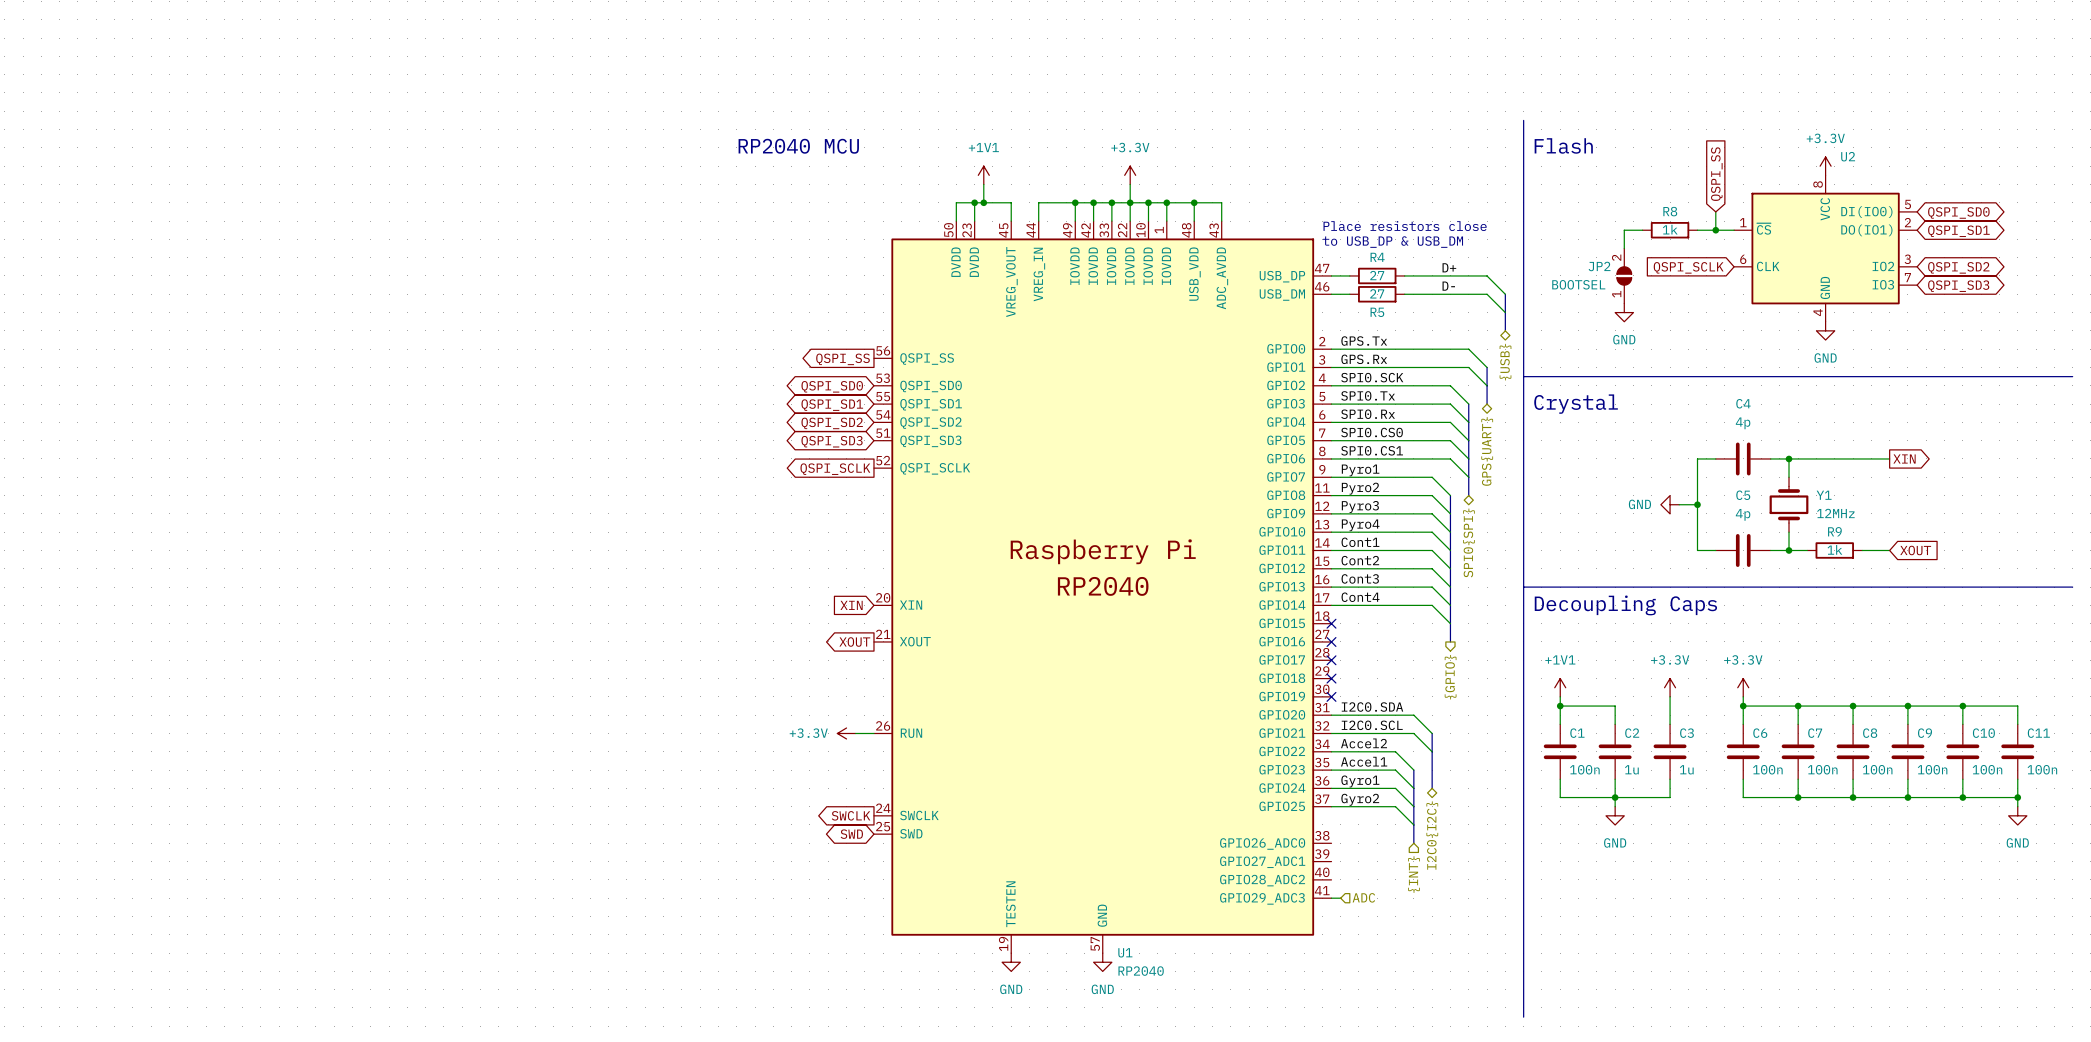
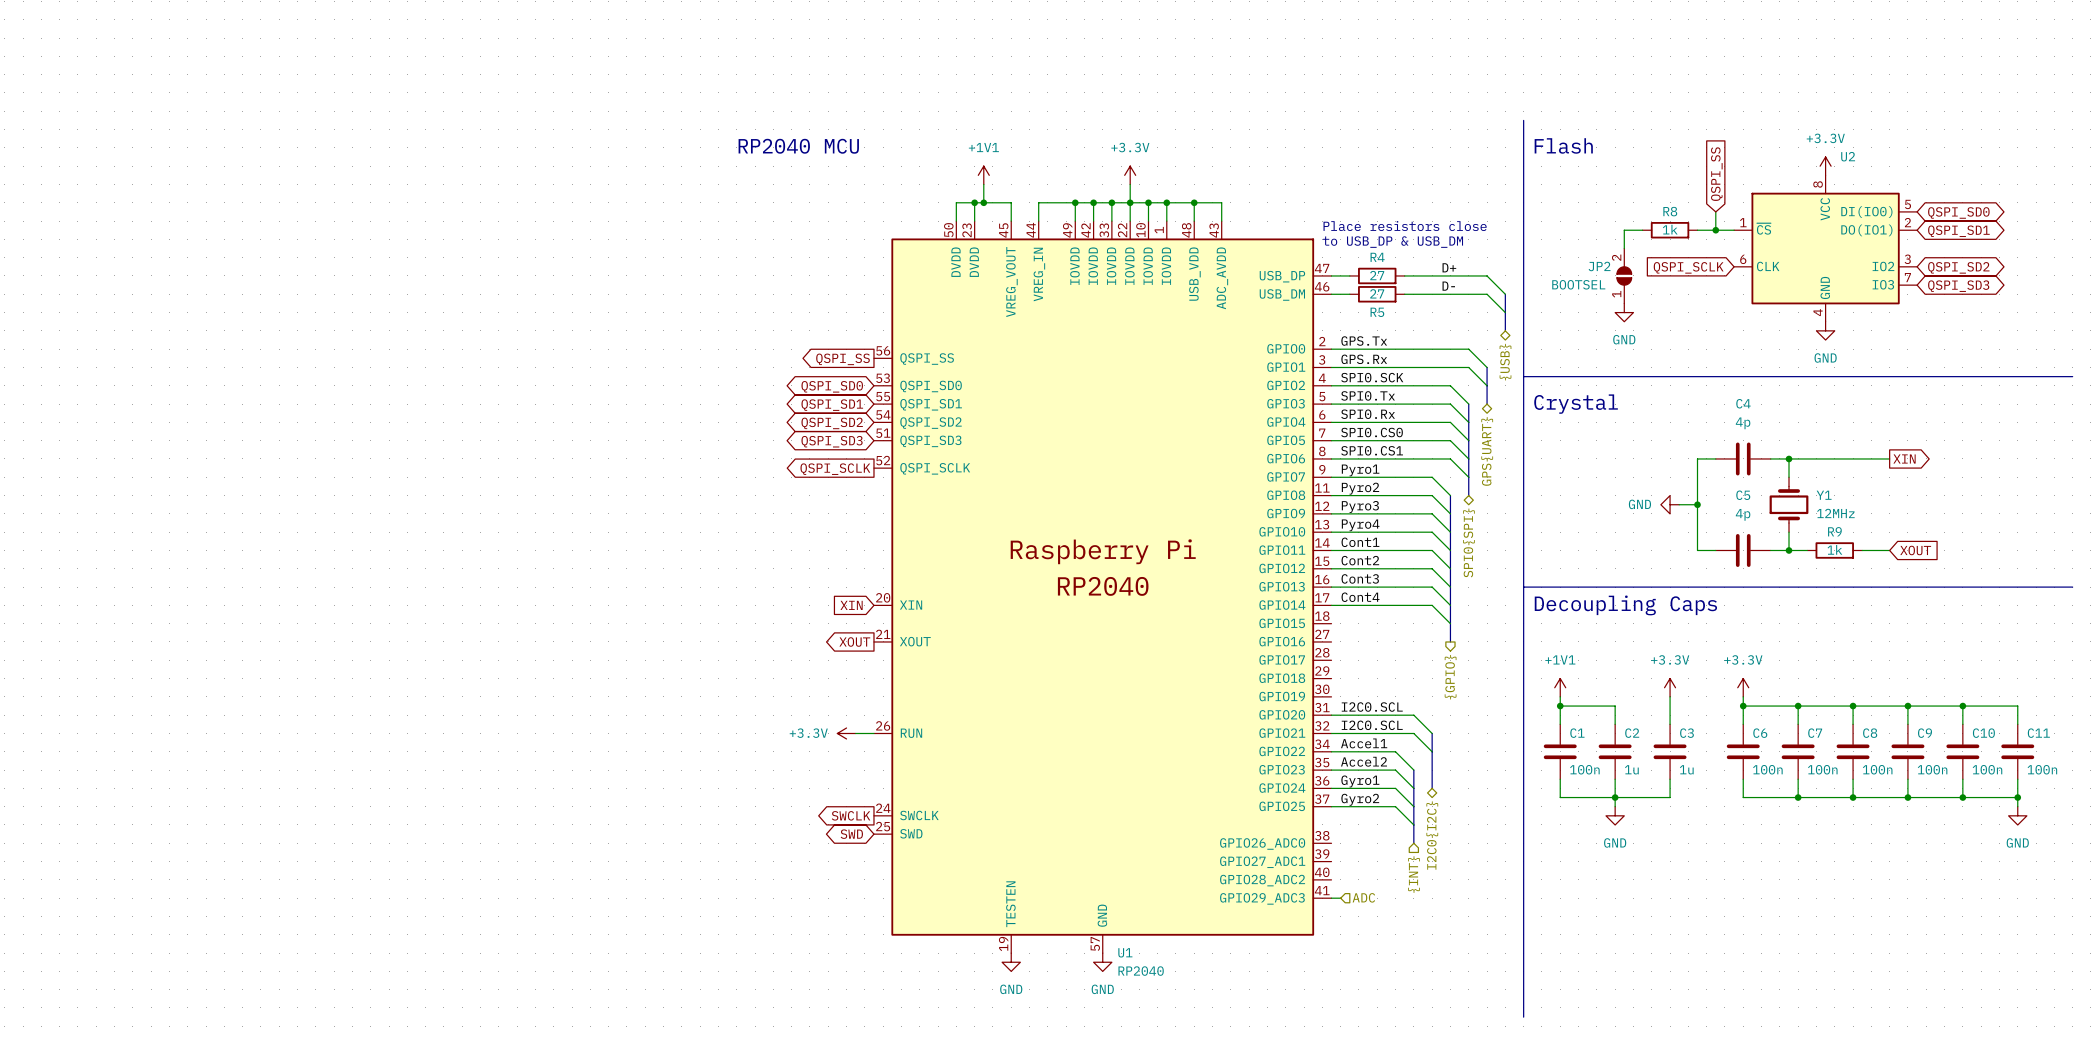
no-connect mark: (1331, 623) -> none
no-connect mark: (1331, 641) -> none
no-connect mark: (1331, 660) -> none
no-connect mark: (1331, 678) -> none
no-connect mark: (1331, 696) -> none
label: I2C0.SDA (1372, 707) -> I2C0.SCL (1372, 707)
label: Accel2 (1364, 743) -> Accel1 (1364, 743)
label: Accel1 (1364, 761) -> Accel2 (1364, 761)

